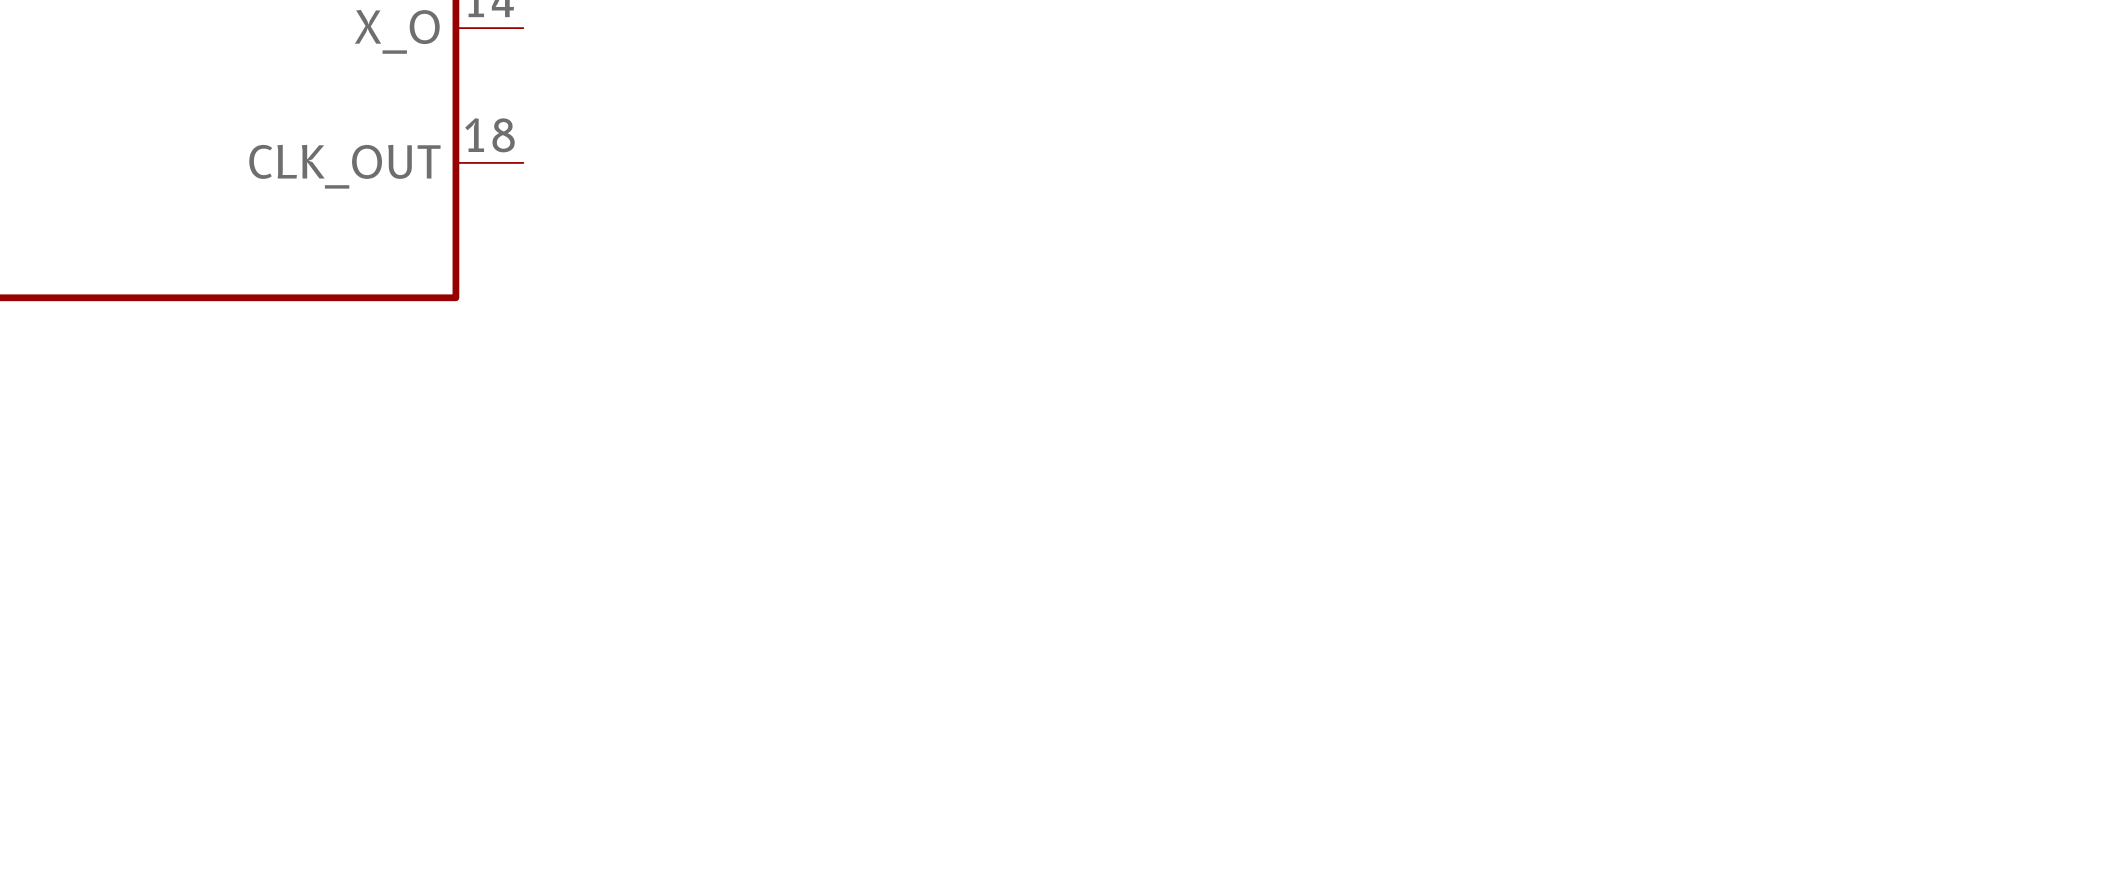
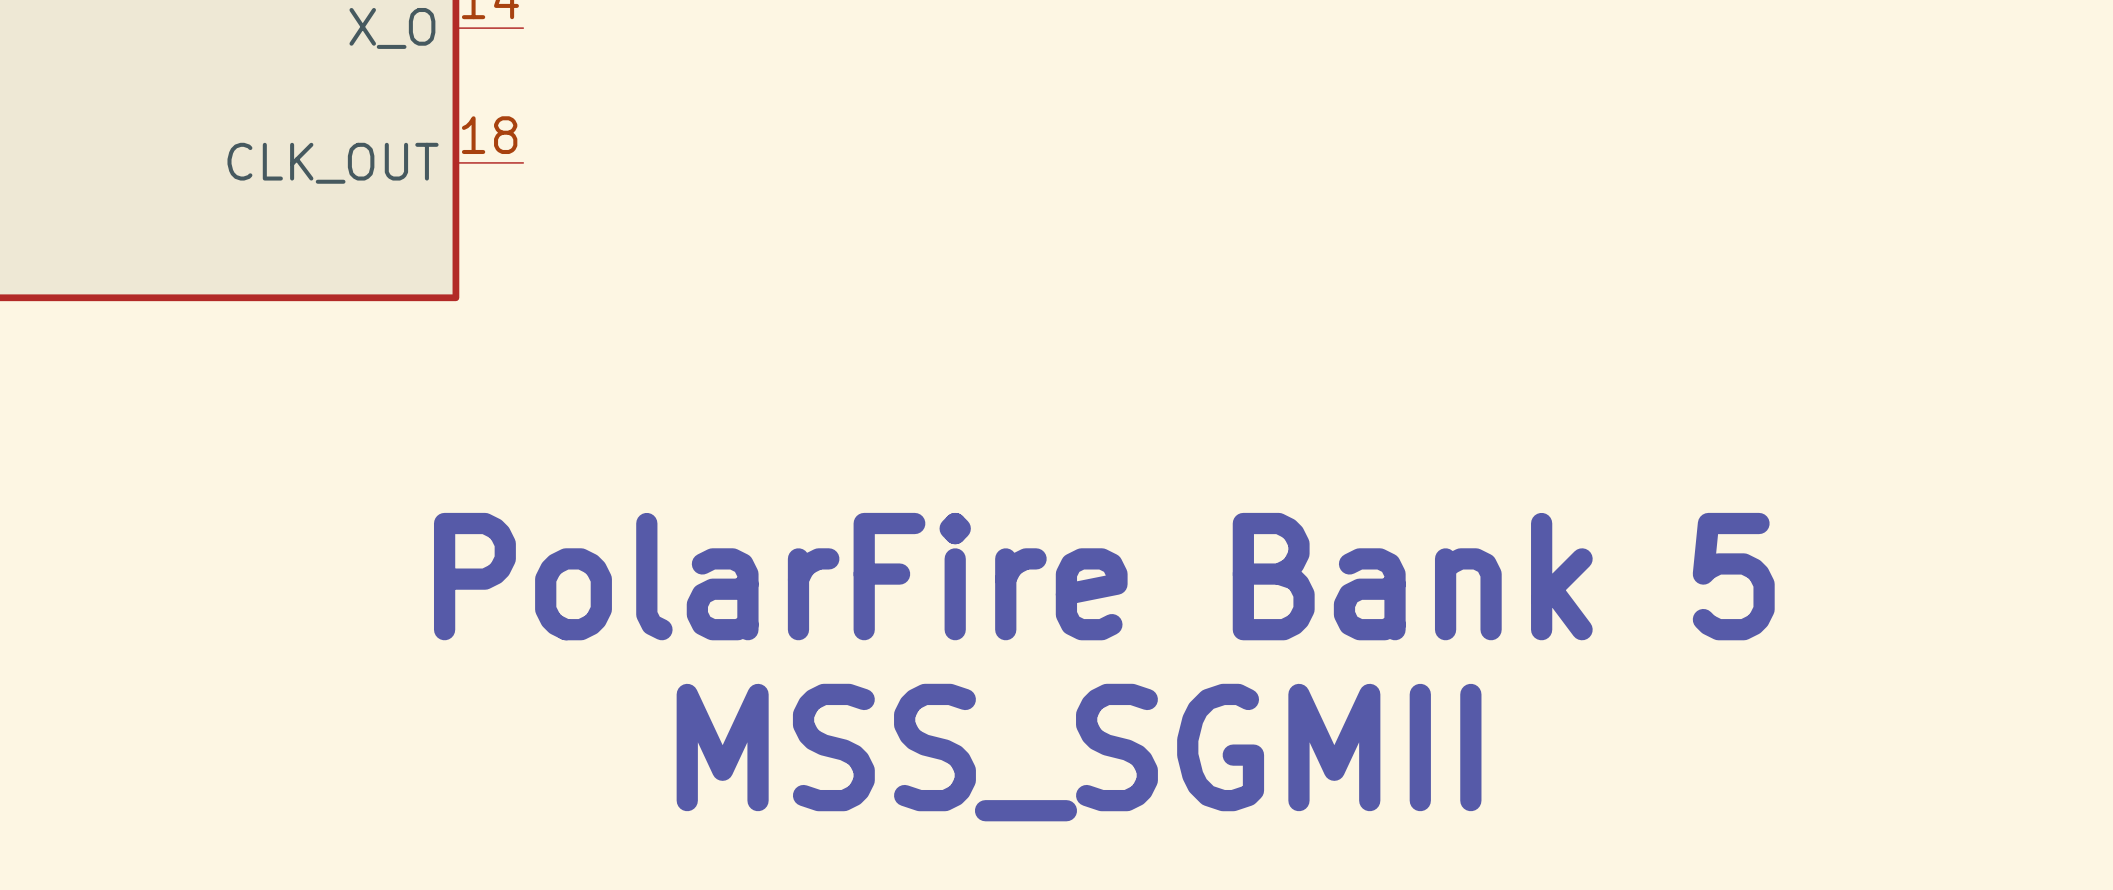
text: none -> PolarFire Bank 5 (1104, 576)
text: none -> MSS_SGMII (1079, 752)

